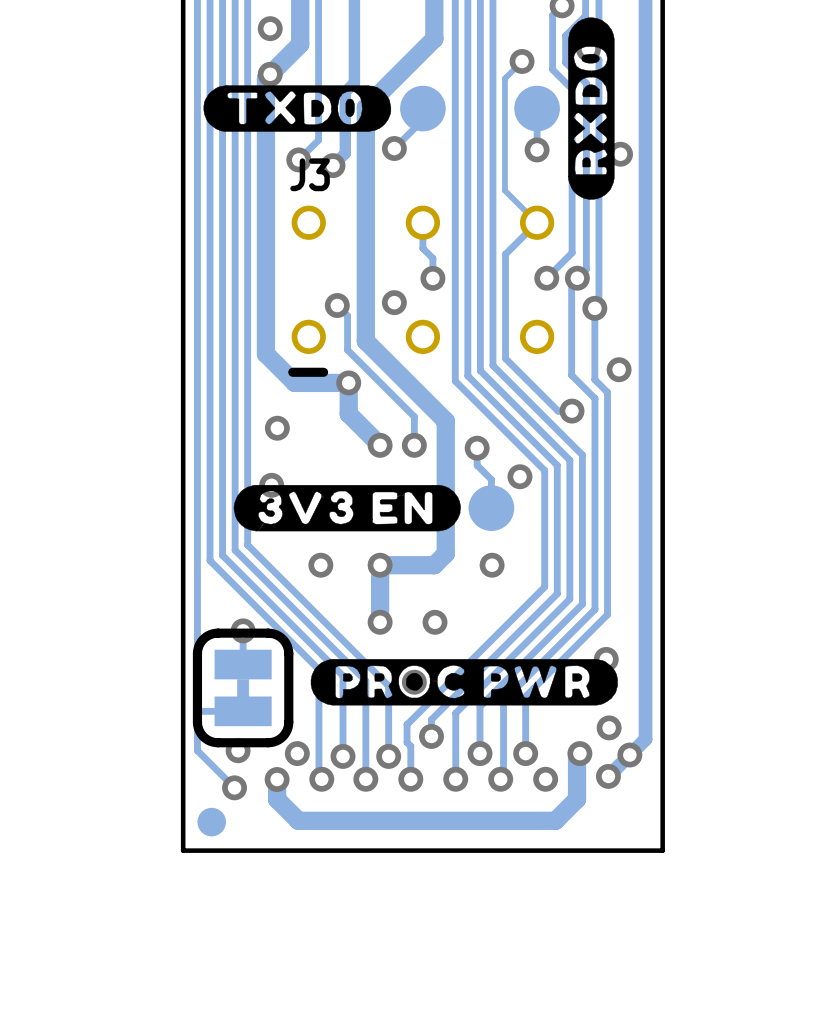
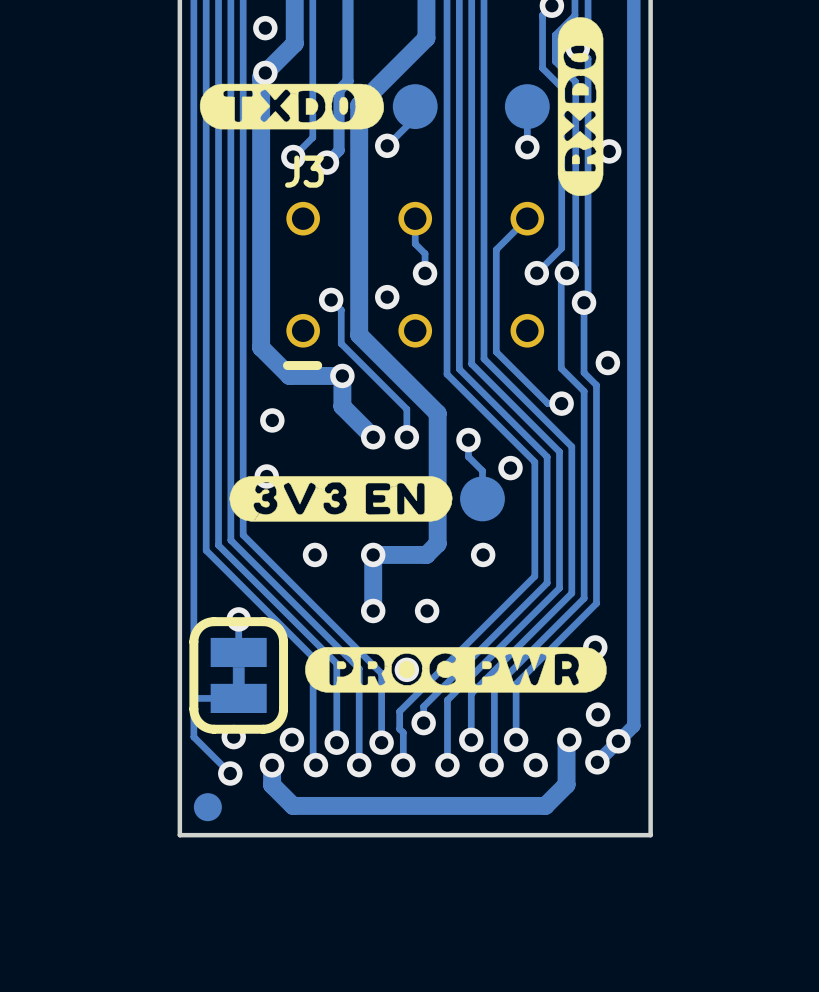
track: (522, 61) (504, 78) (504, 190) (537, 222) -> none
via: (522, 61) -> none

